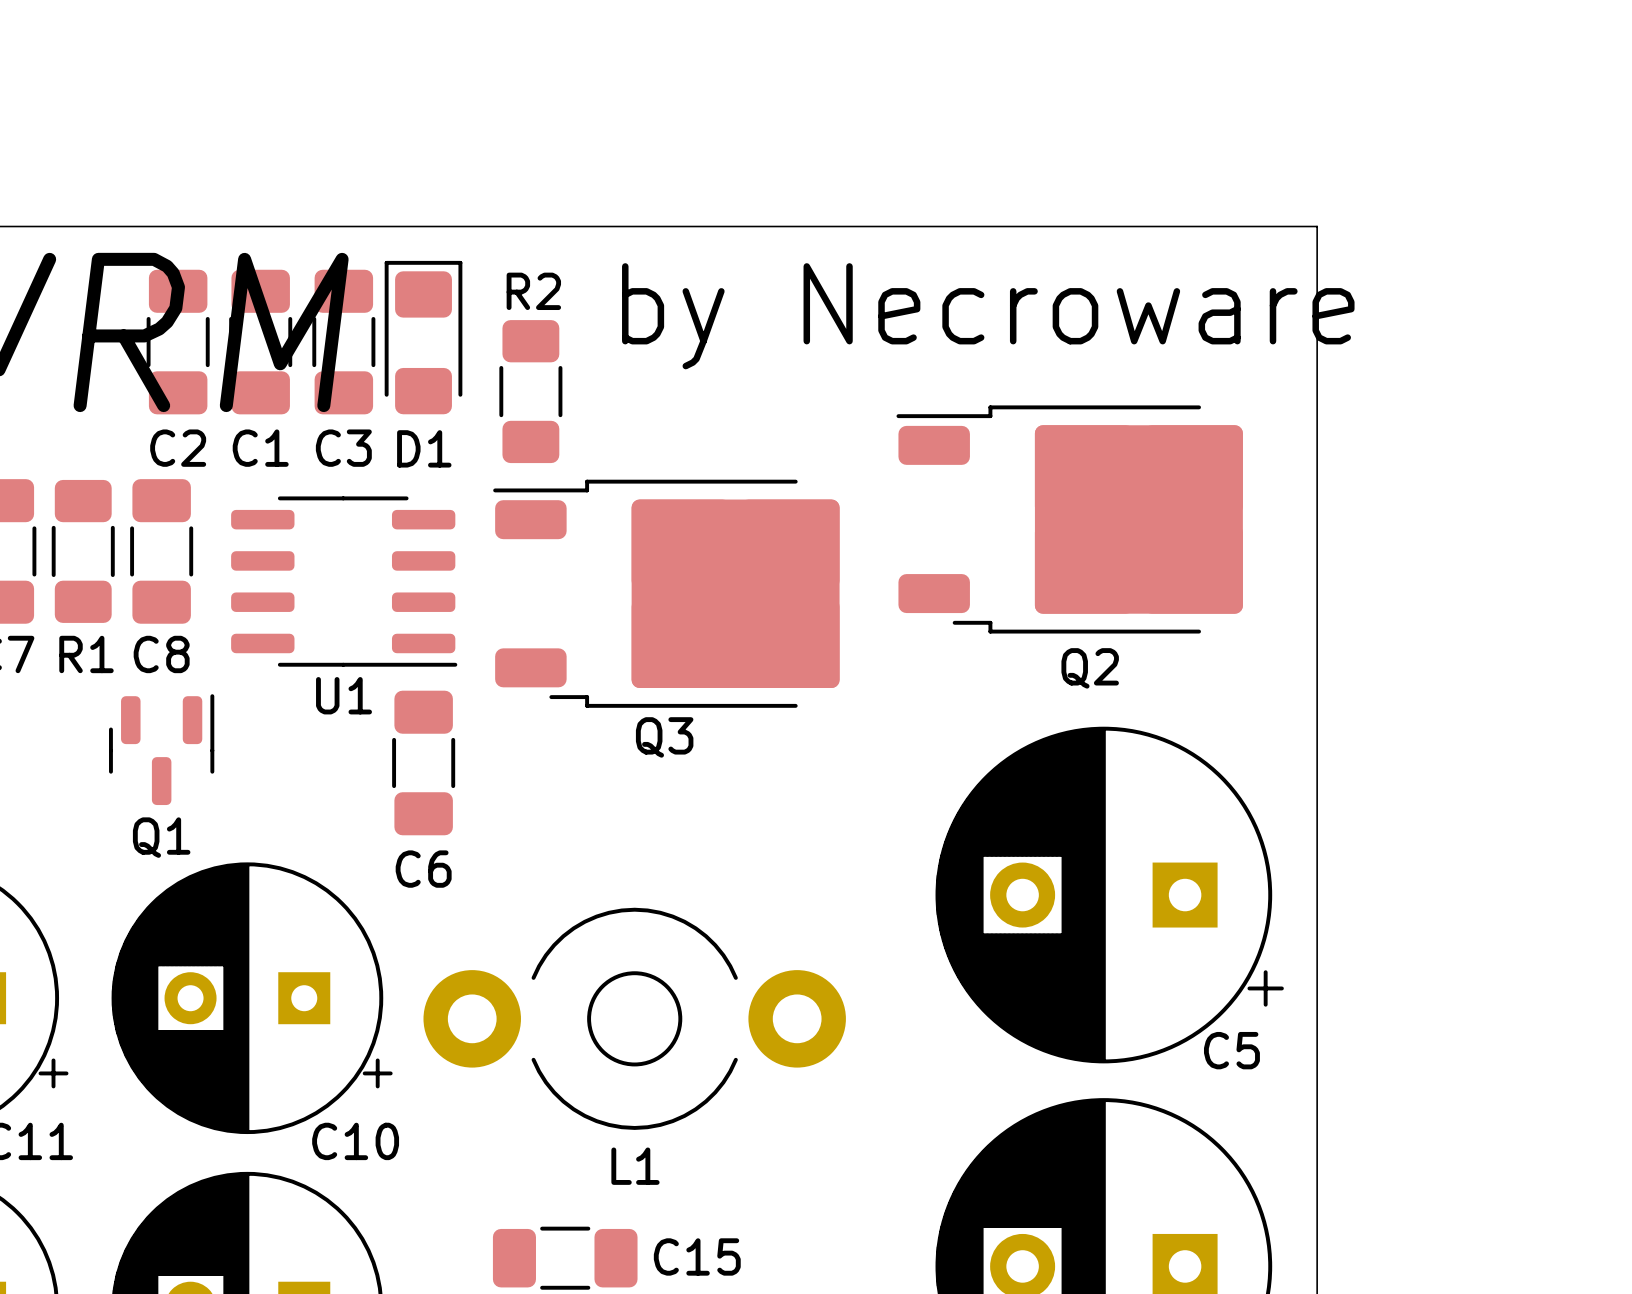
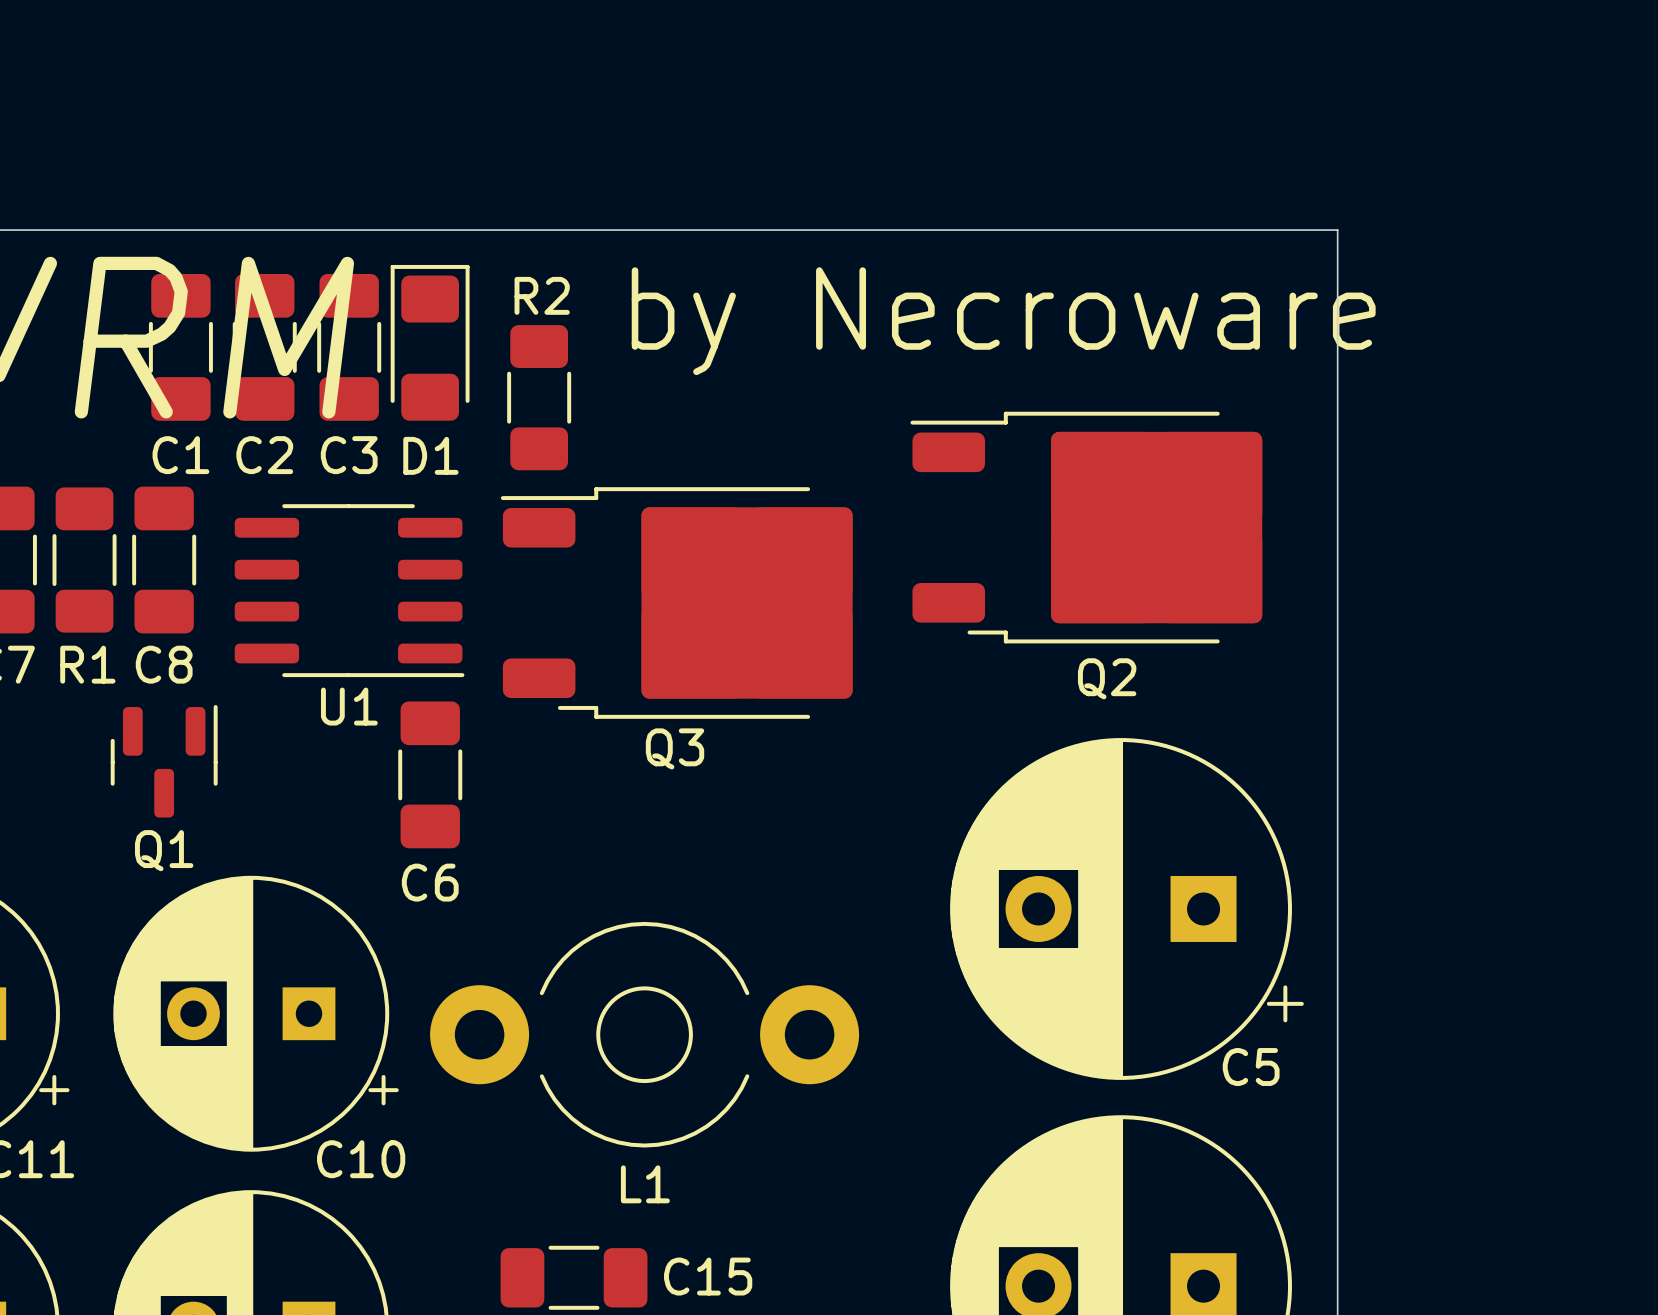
C2 name: C2 (178, 448) -> C1 (180, 455)
C1 name: C1 (260, 448) -> C2 (264, 455)

